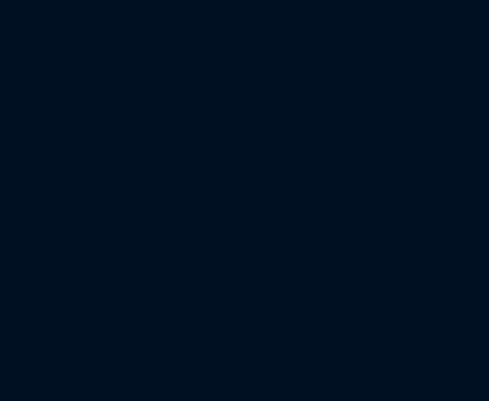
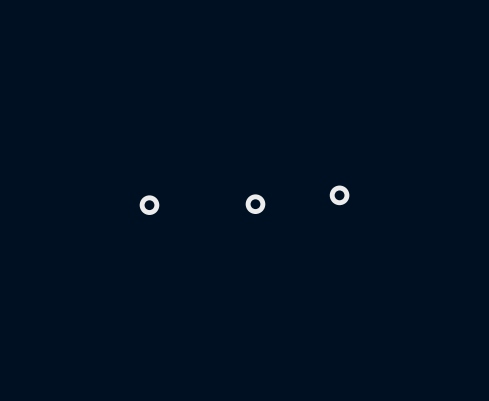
via: none -> (339, 195)
via: none -> (255, 204)
via: none -> (149, 205)

